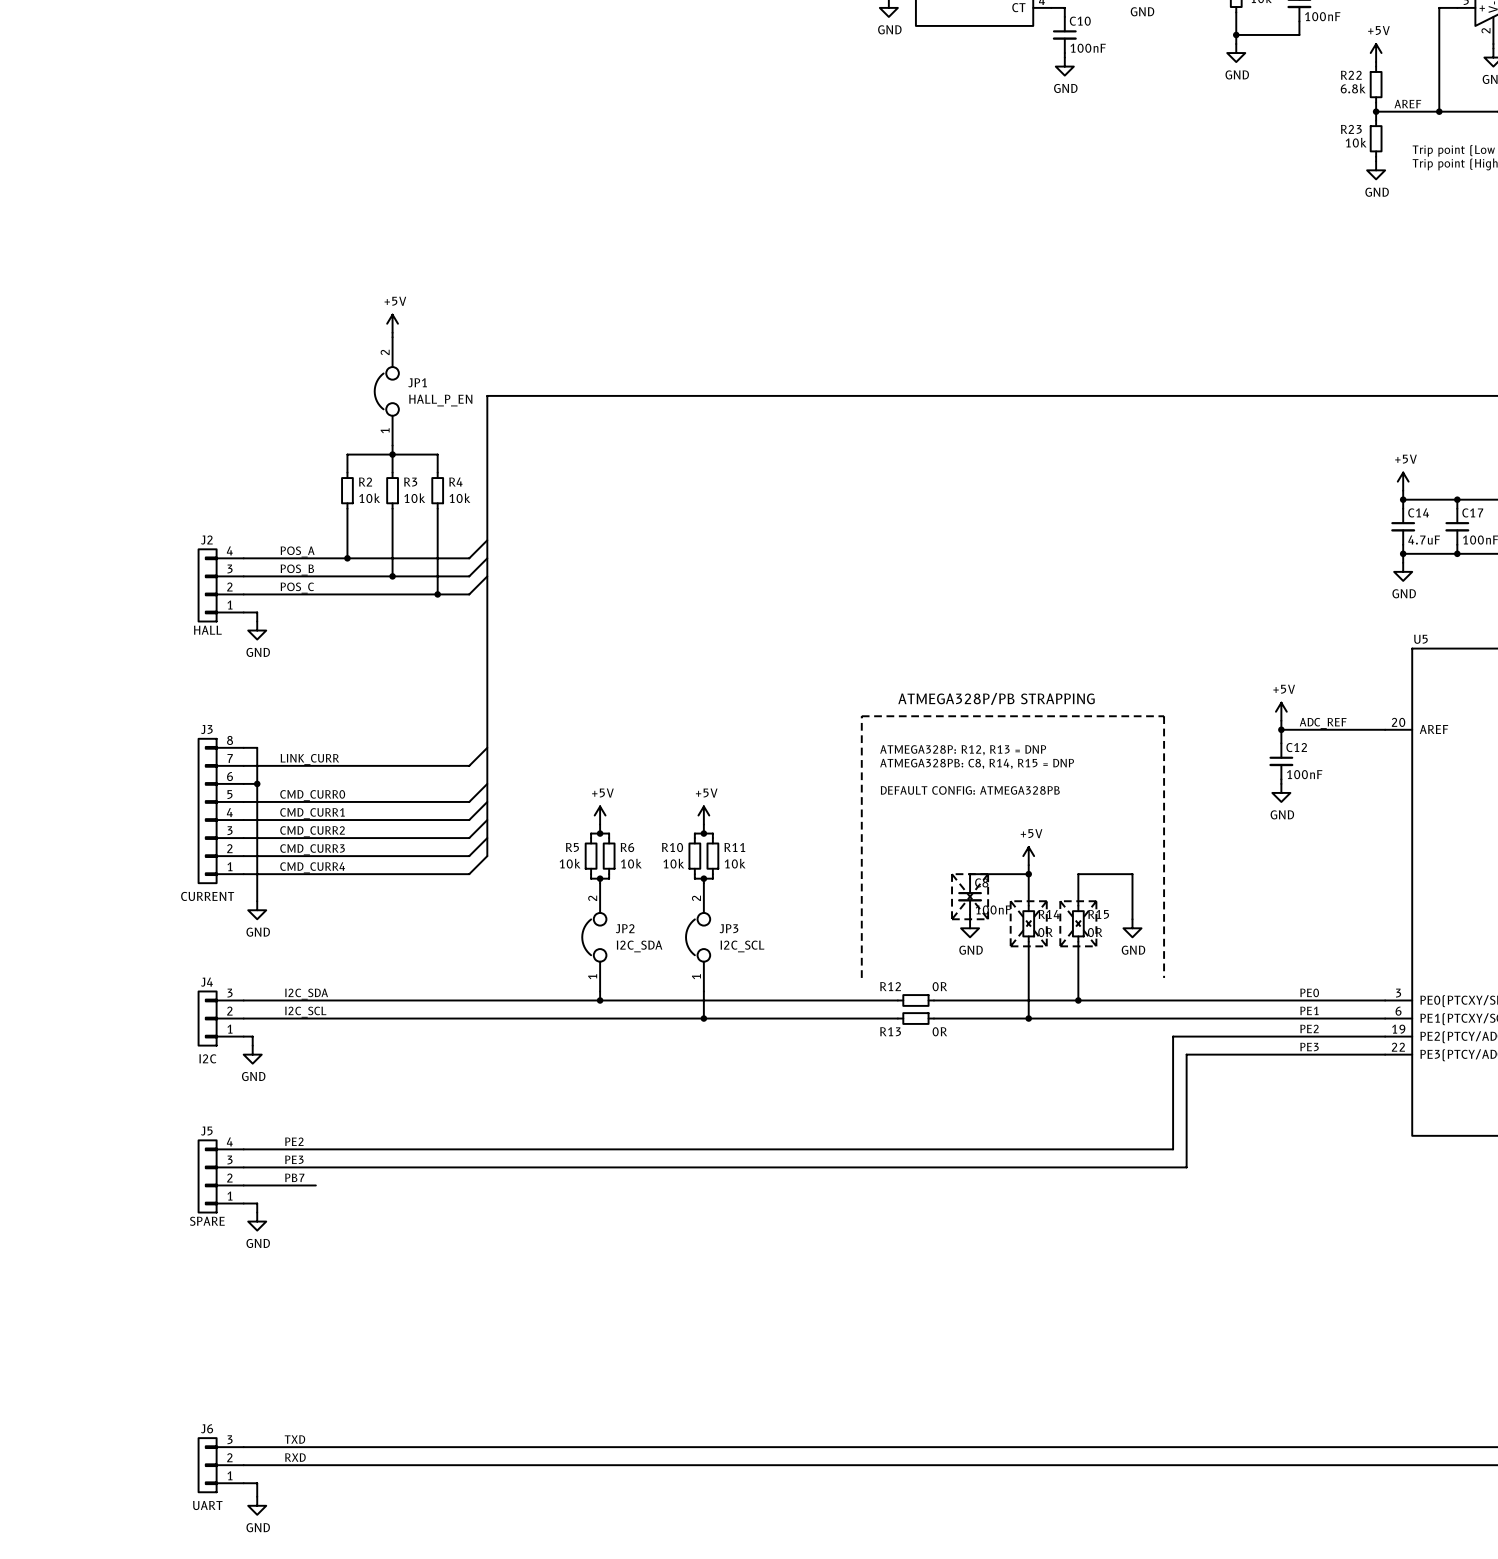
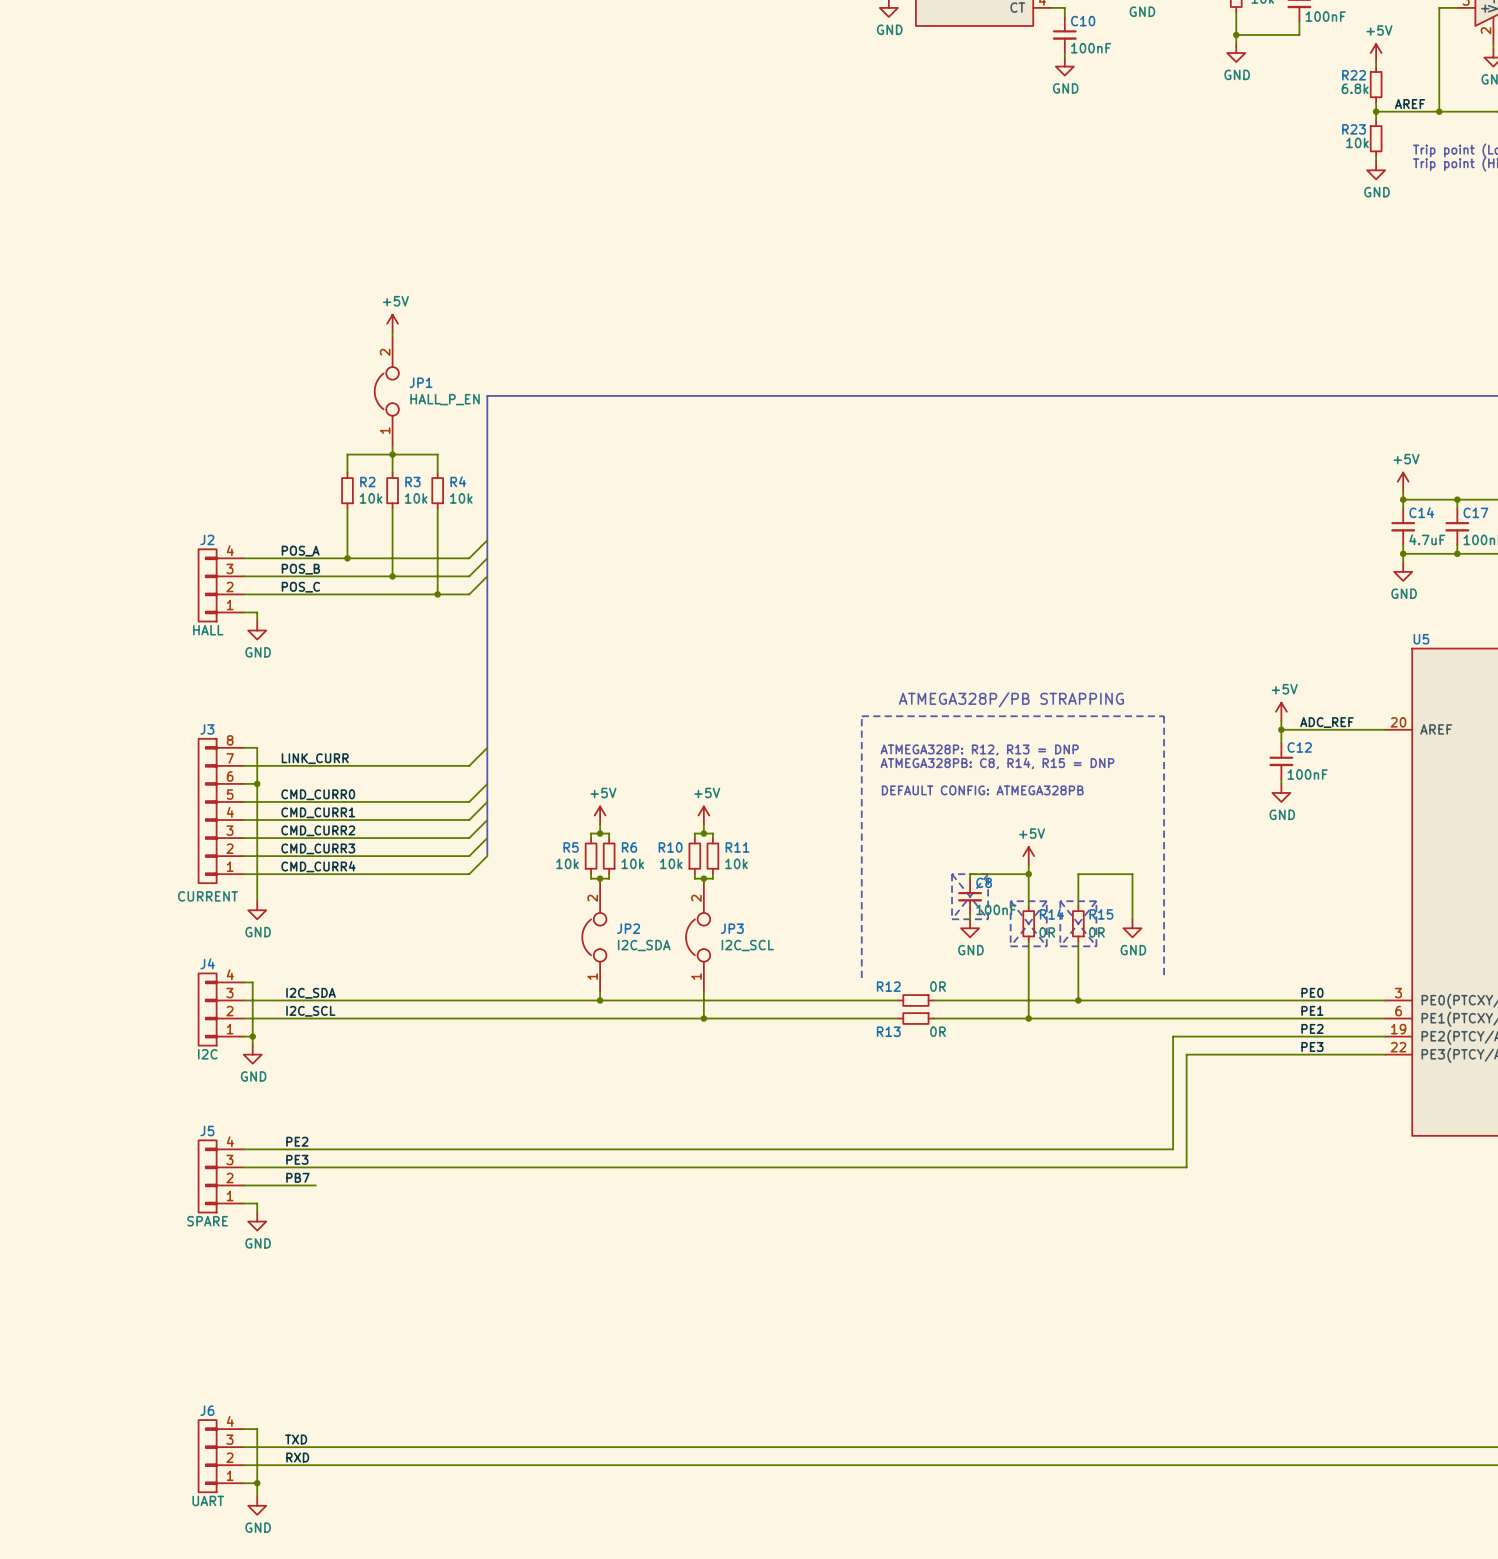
wire: none -> (243, 982) (252, 982) (252, 1036)
J4 symbol: [198, 991, 244, 1046] -> [198, 973, 244, 1046]
junction: none -> (252, 1036)
wire: none -> (243, 1429) (257, 1429) (257, 1483)
J6 symbol: [198, 1438, 244, 1493] -> [198, 1420, 244, 1493]
junction: none -> (257, 1483)

